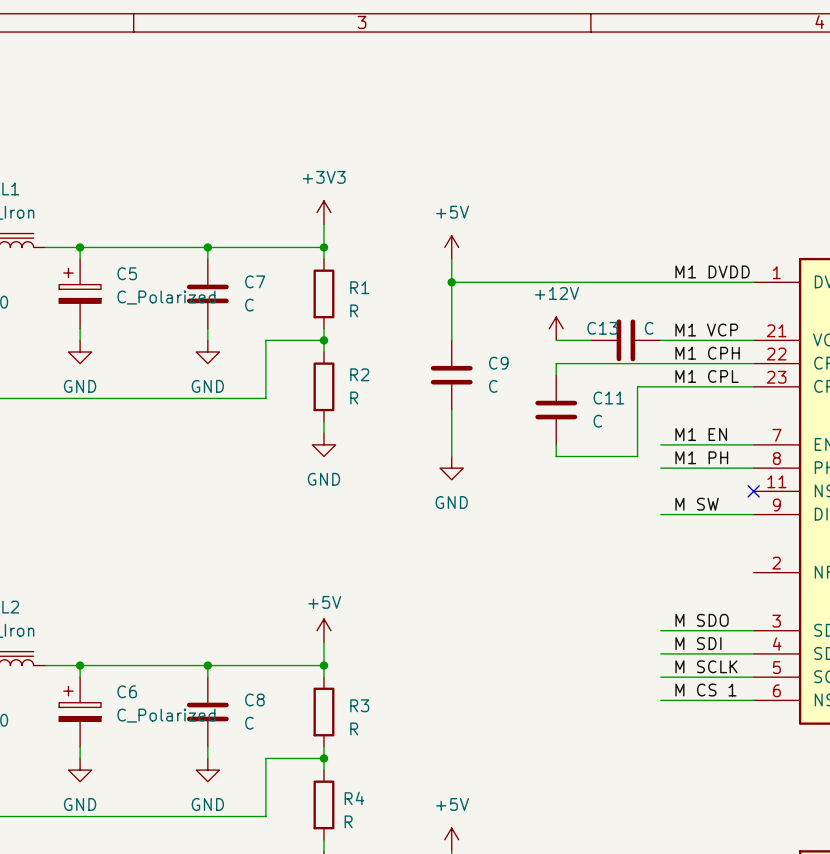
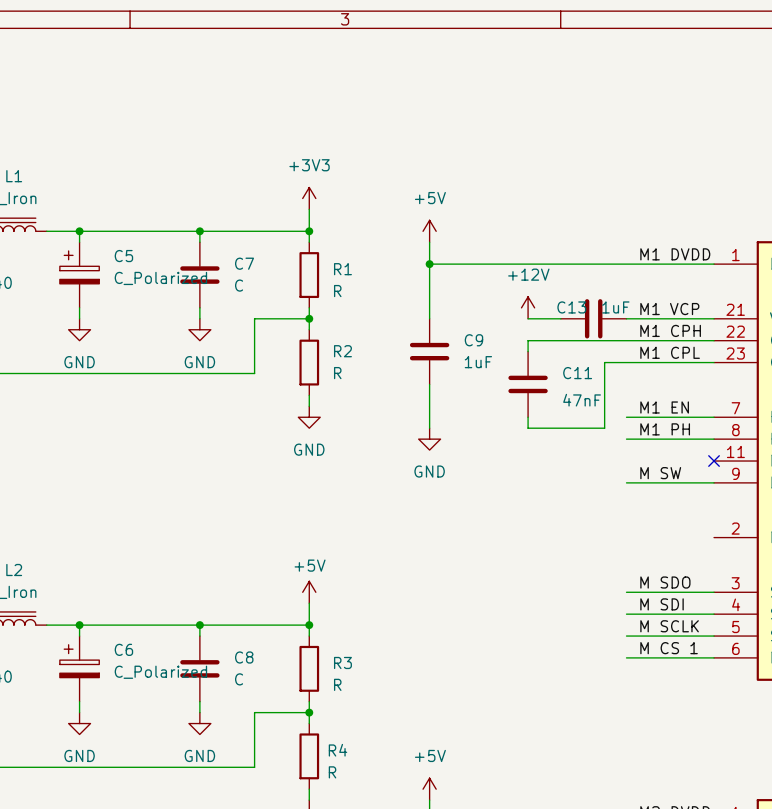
C13 value: C (649, 328) -> 1uF (615, 307)
C9 value: C (493, 386) -> 1uF (478, 362)
C11 value: C (597, 421) -> 47nF (582, 400)

